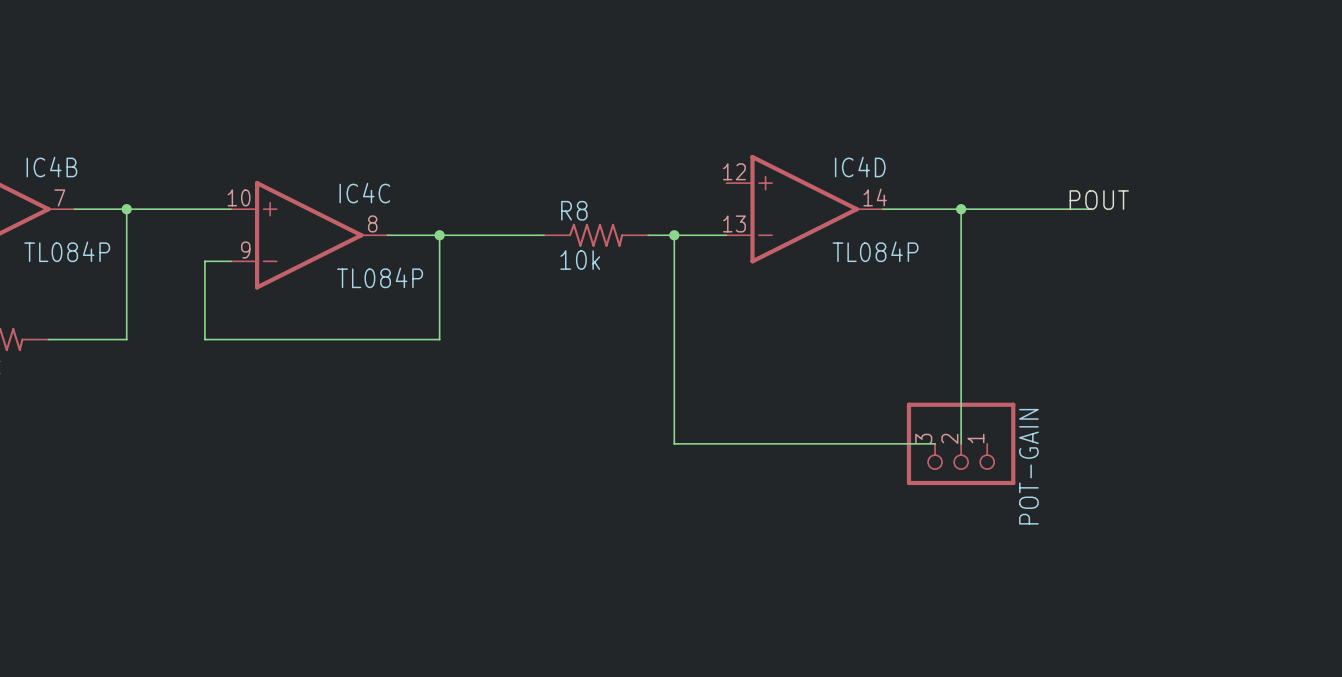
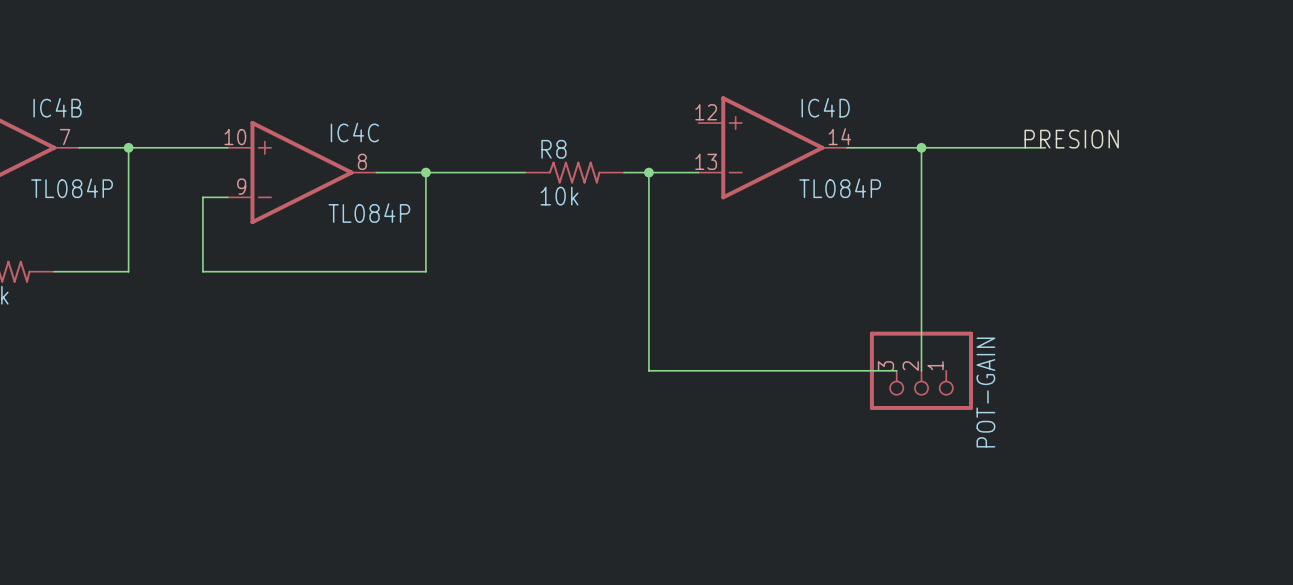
label: POUT (1099, 200) -> PRESION (1071, 139)

